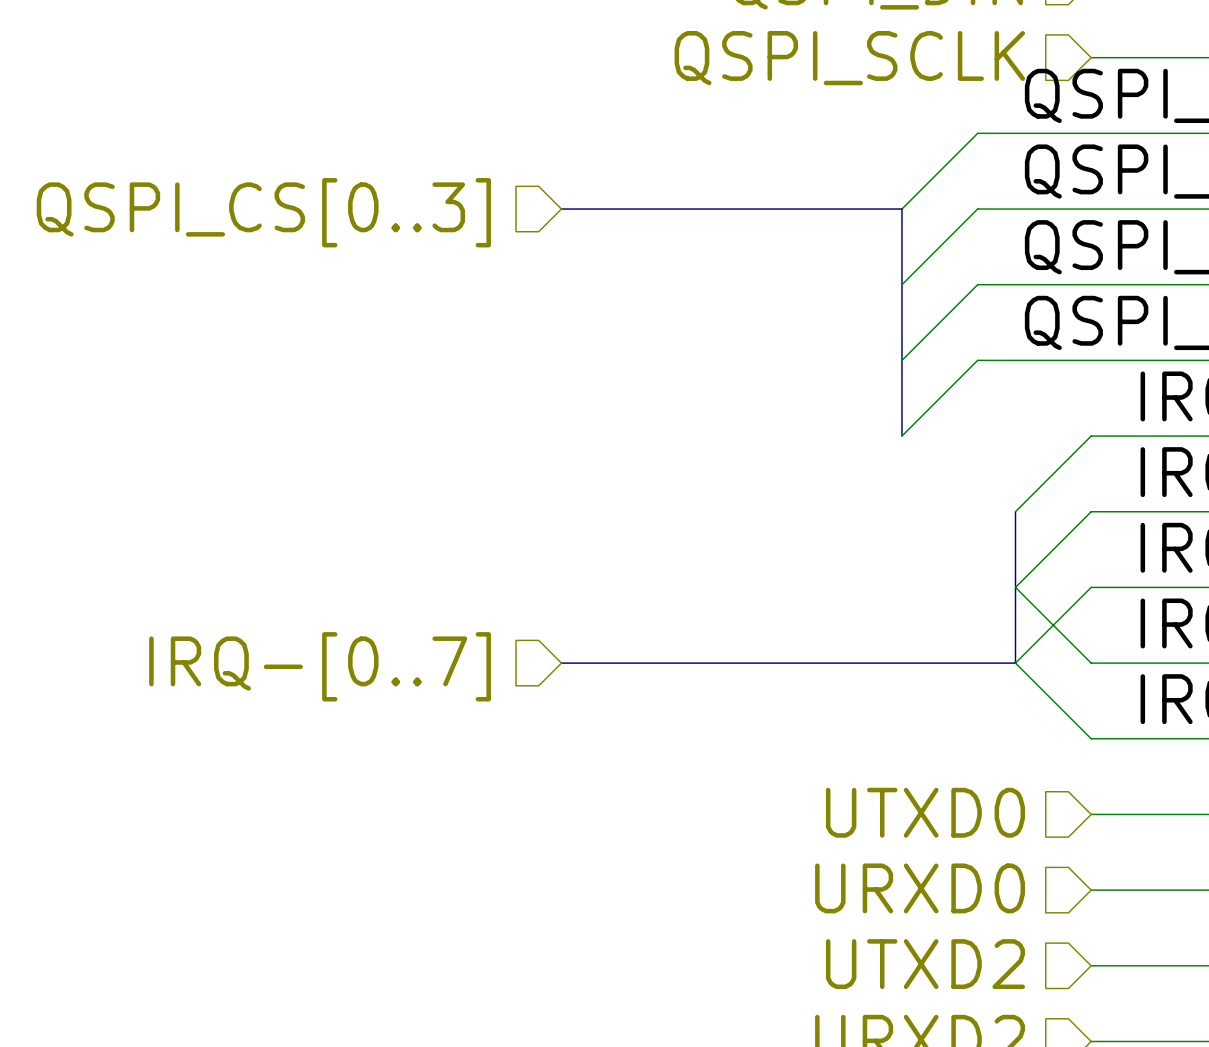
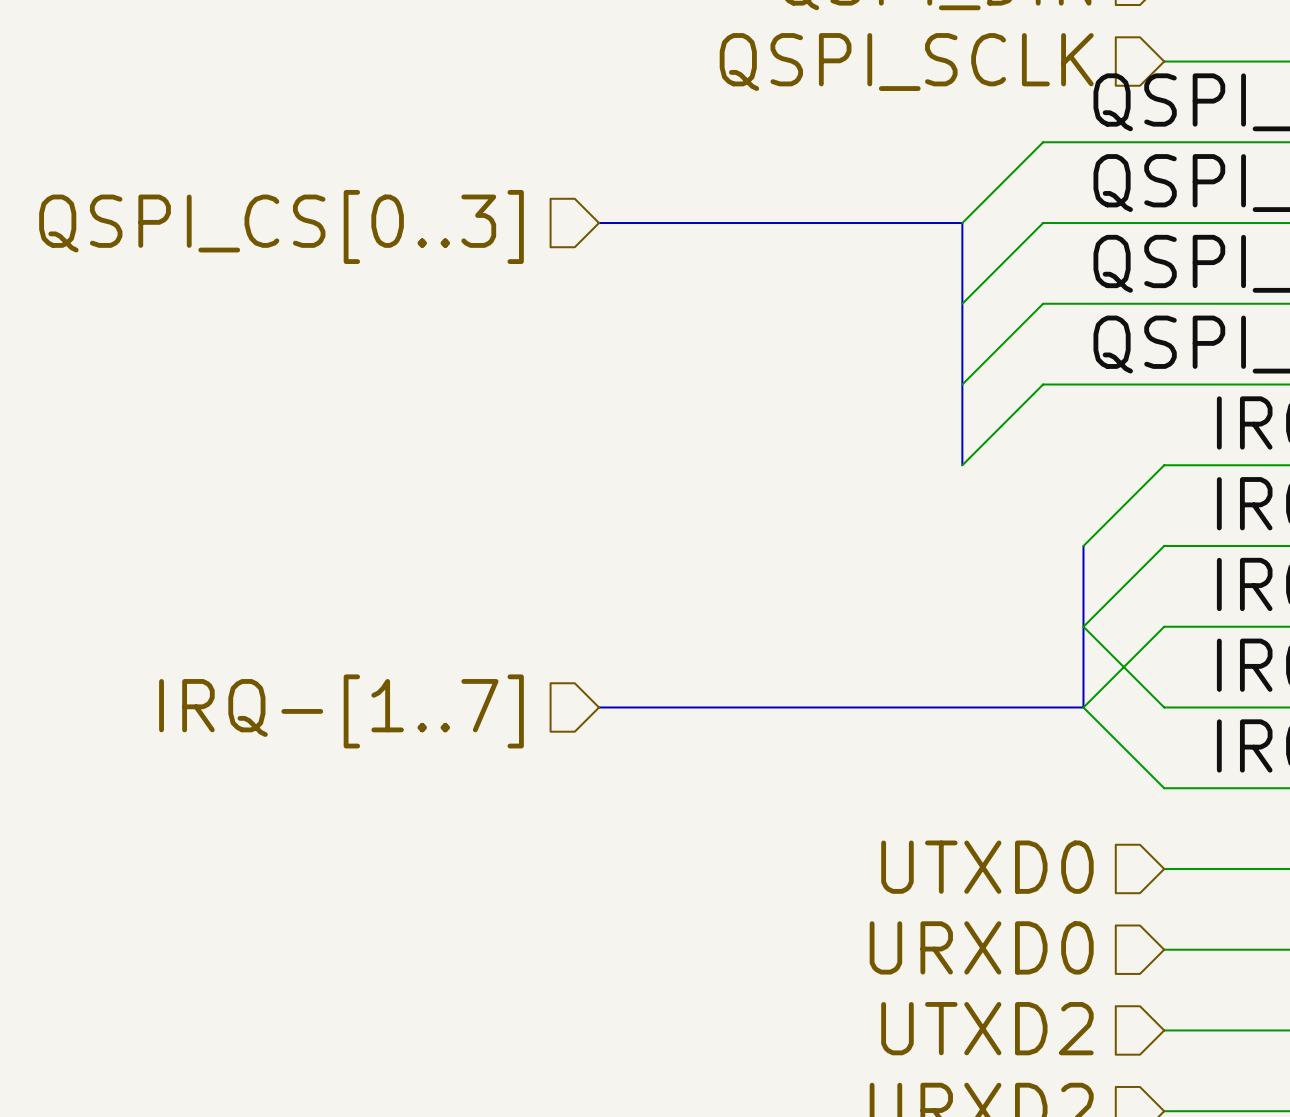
hierarchical label: IRQ-[0..7] (320, 666) -> IRQ-[1..7] (341, 711)

